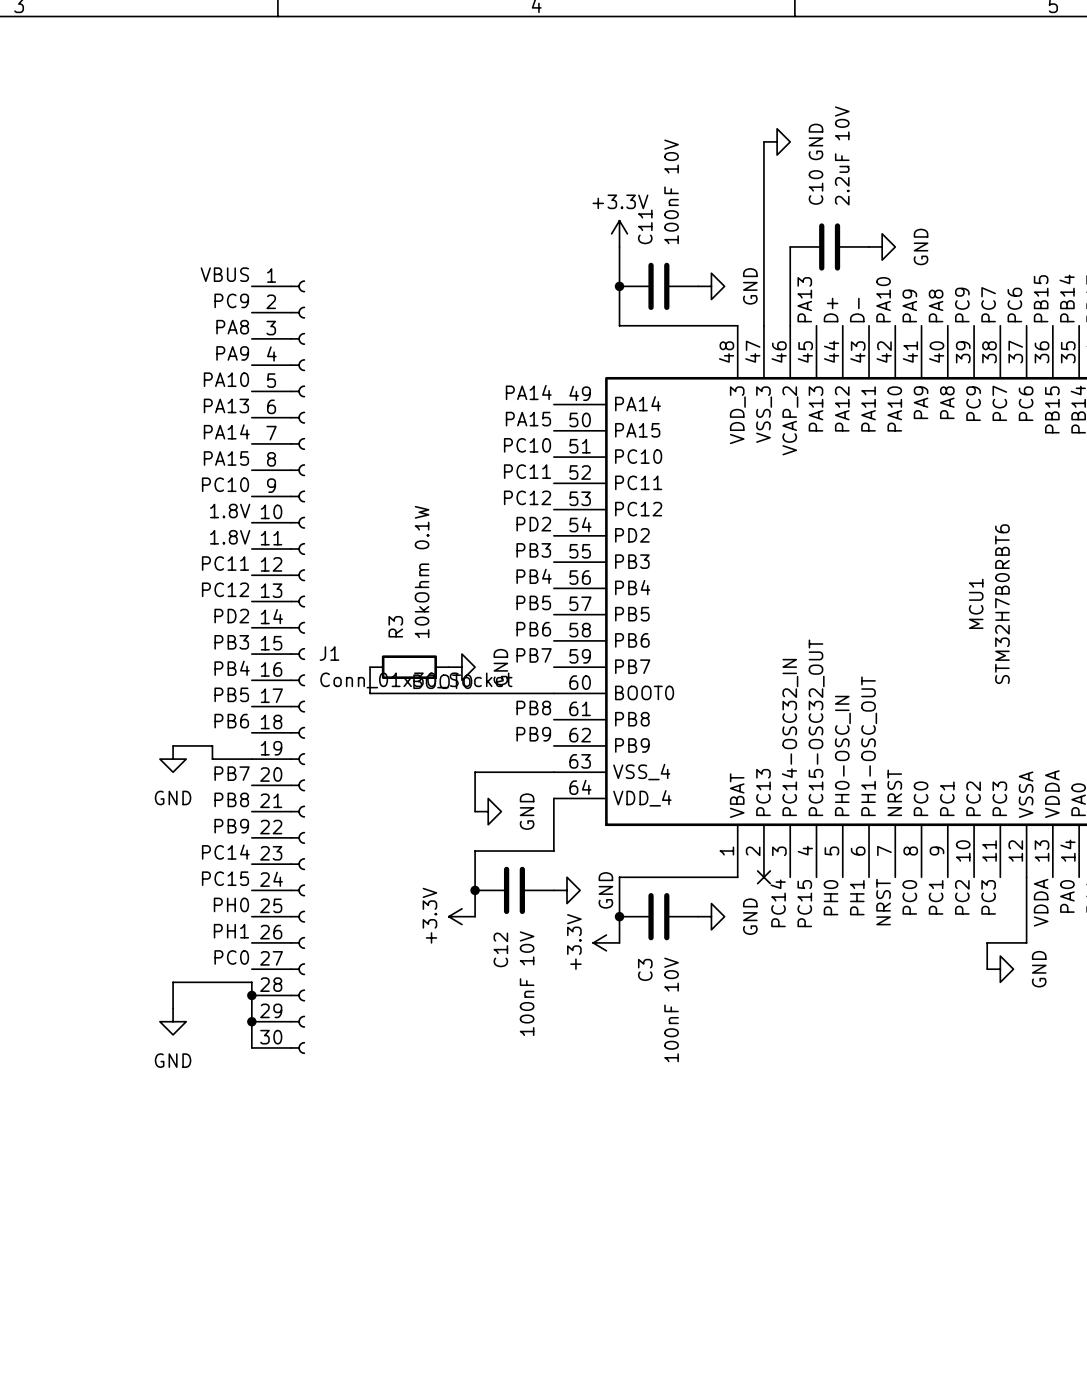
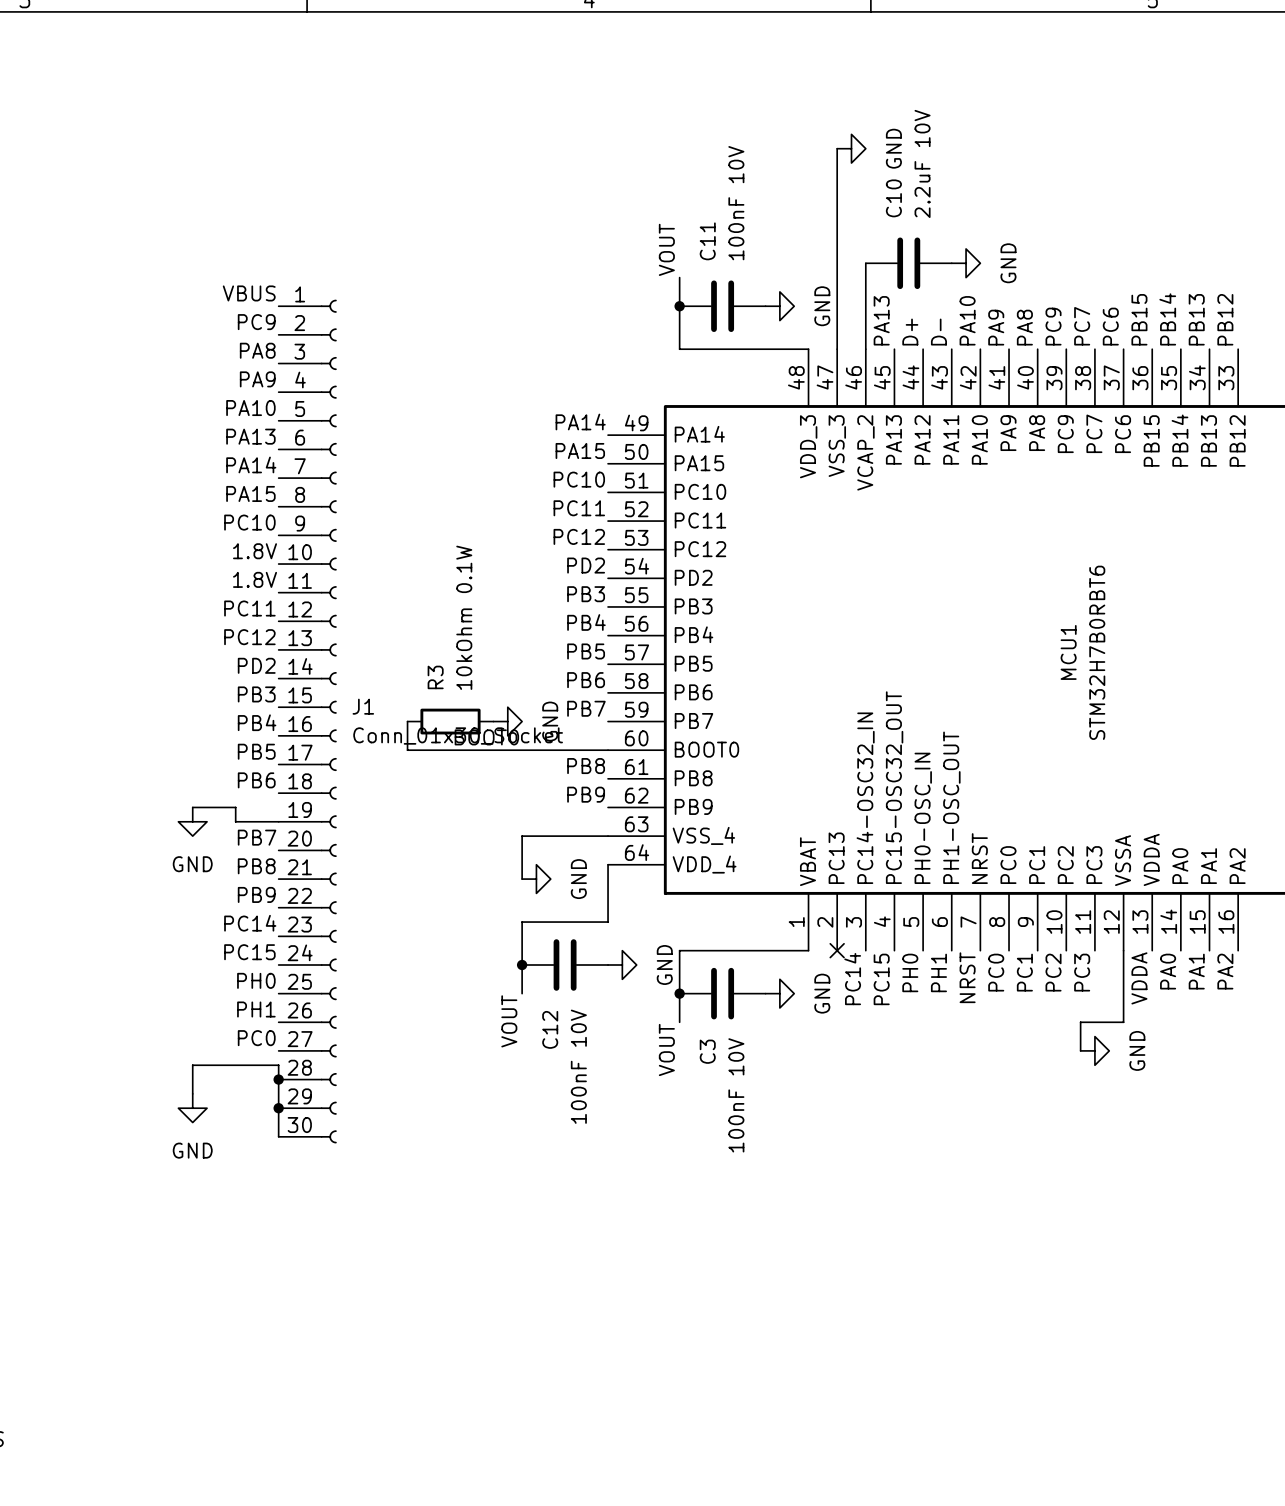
power symbol: +3.3V (619, 233) -> none
label: none -> VOUT (666, 249)
wire: (619, 246) (619, 260) -> none
power symbol: +3.3V (461, 916) -> none
label: none -> VOUT (509, 1021)
power symbol: +3.3V (606, 942) -> none
label: none -> VOUT (666, 1050)

